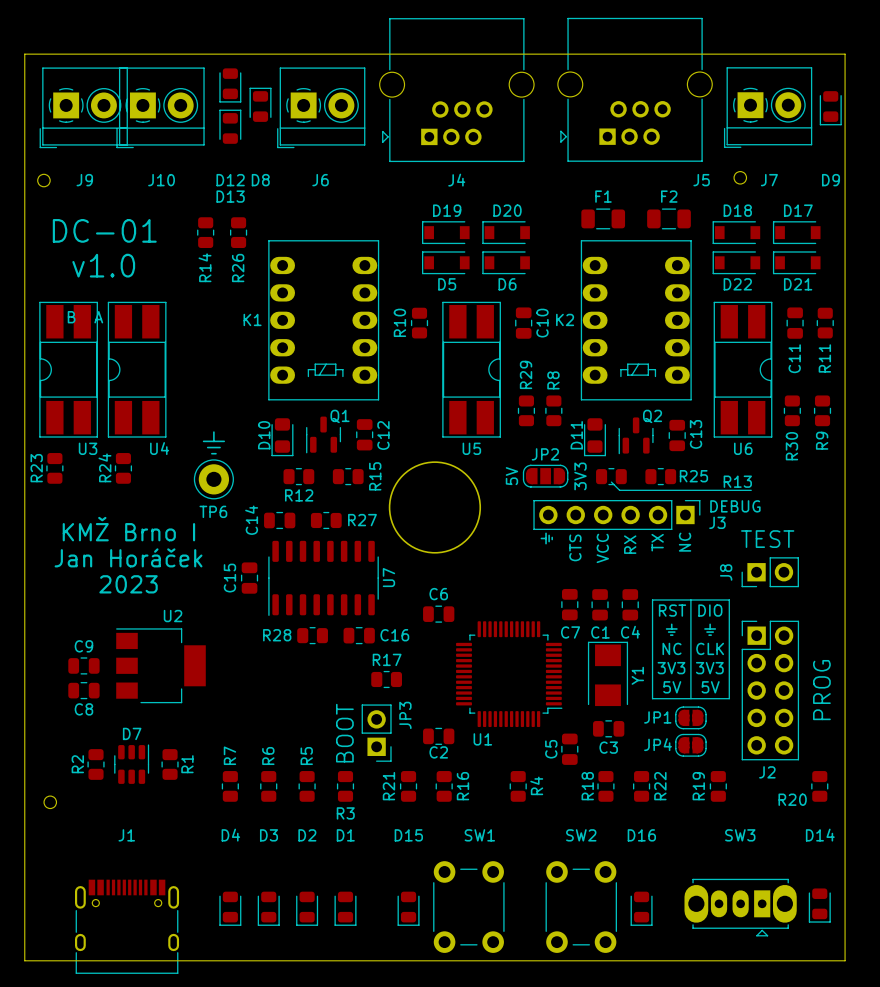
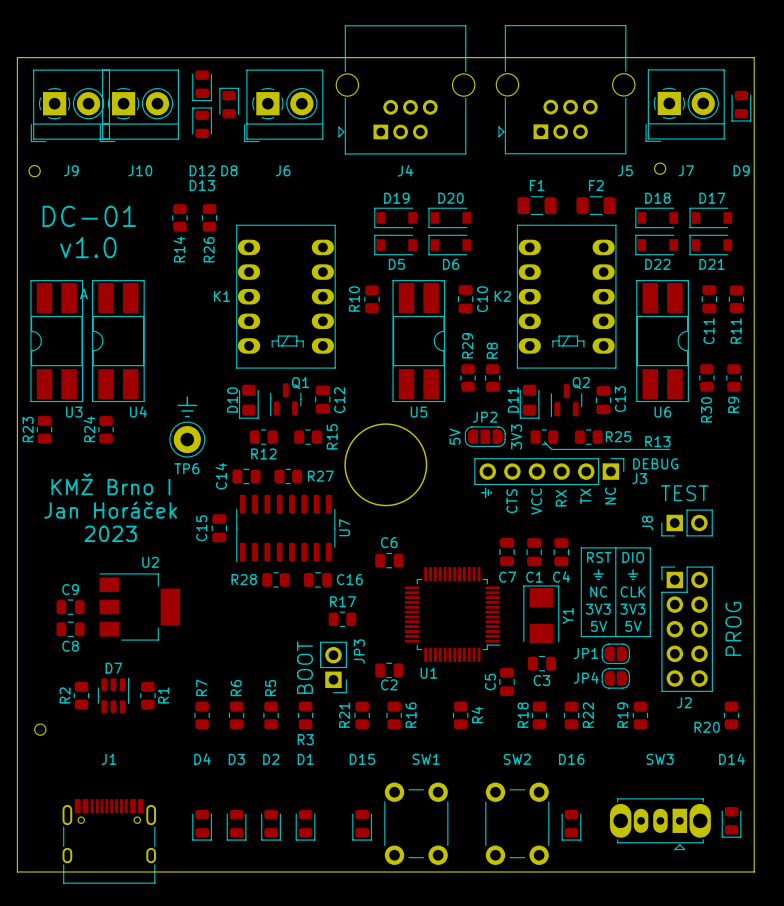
text: B (71, 317) -> none

